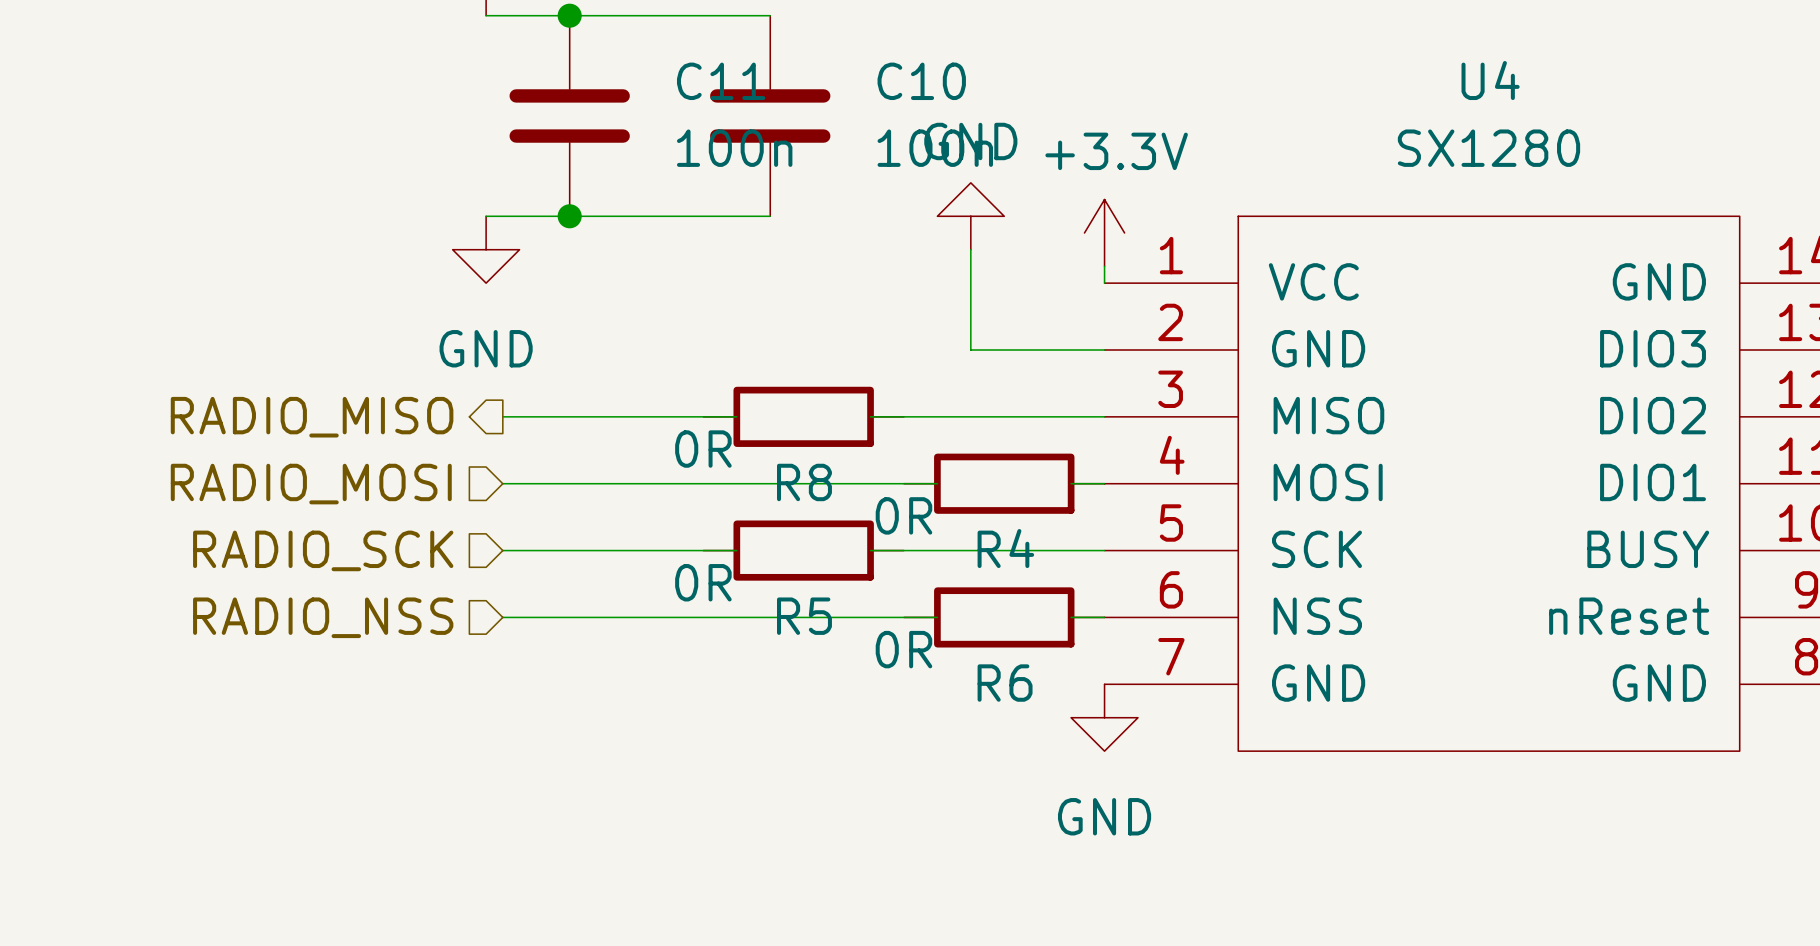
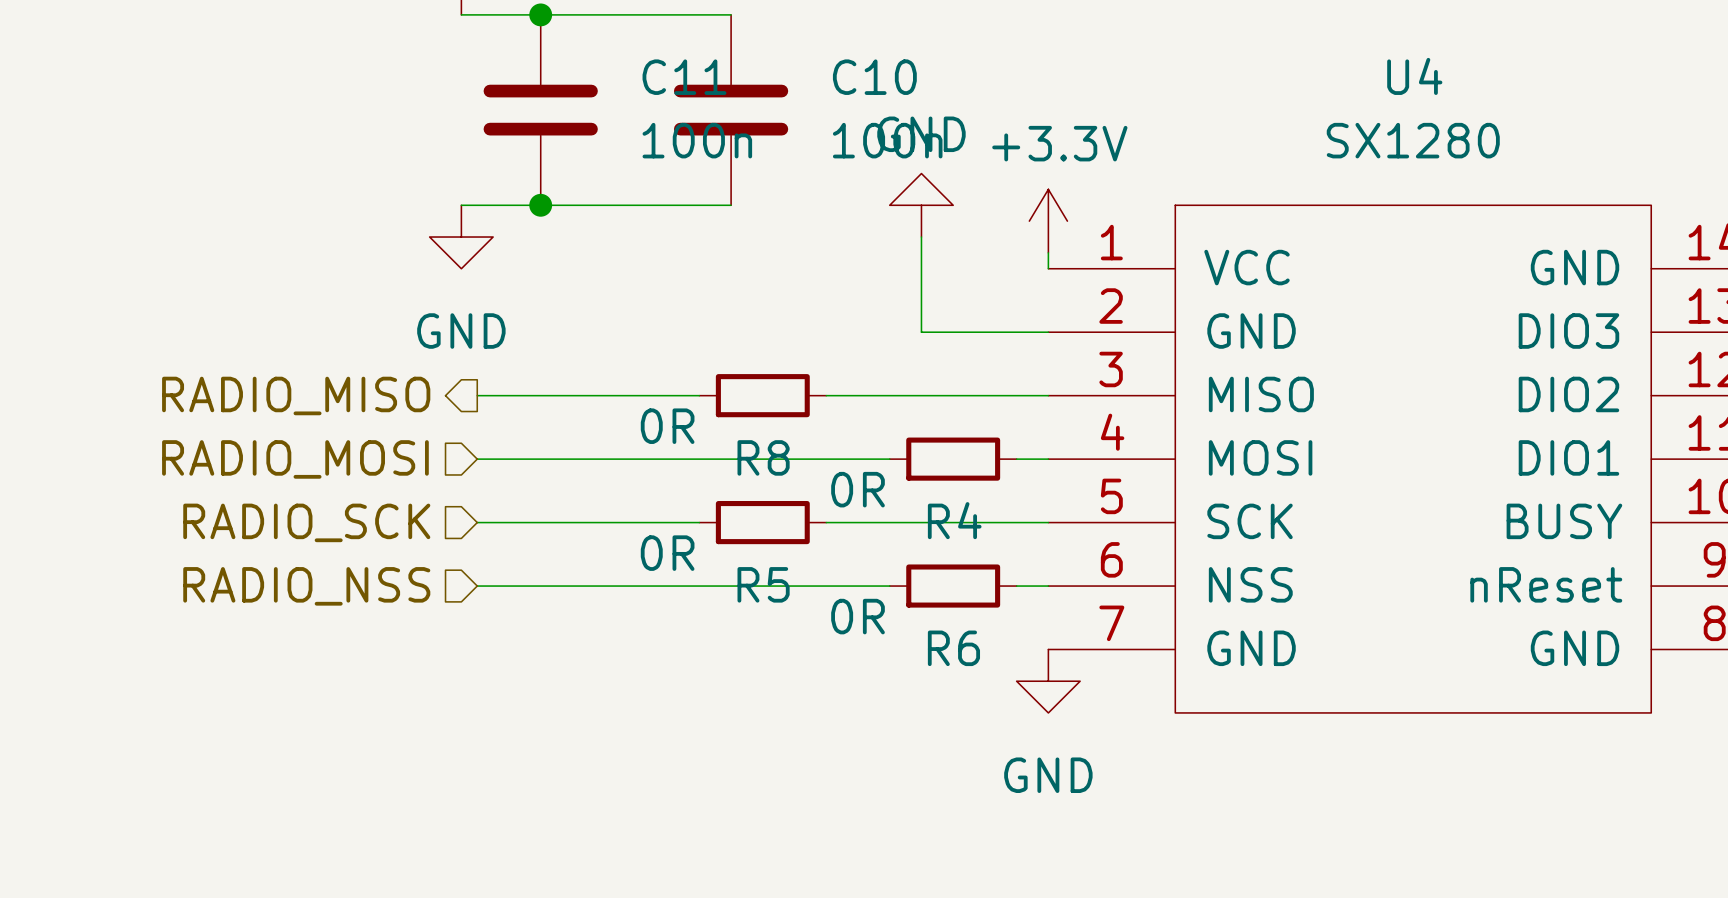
R8 symbol: [703, 386, 904, 447] -> [699, 374, 827, 418]
R4 symbol: [903, 453, 1105, 514] -> [889, 437, 1017, 481]
R5 symbol: [703, 520, 904, 581] -> [699, 501, 827, 545]
R6 symbol: [903, 587, 1105, 648] -> [889, 564, 1017, 608]

